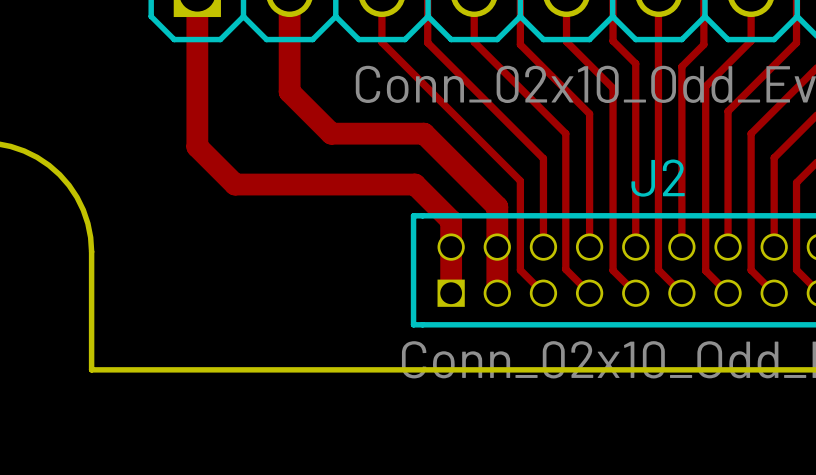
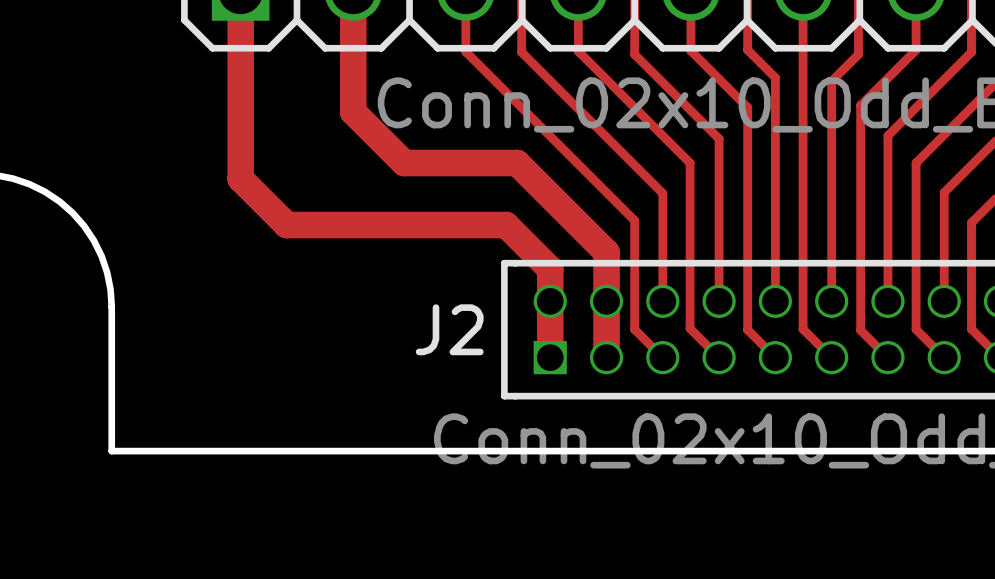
J2 name position: J2 (658, 178) -> J2 (449, 329)

